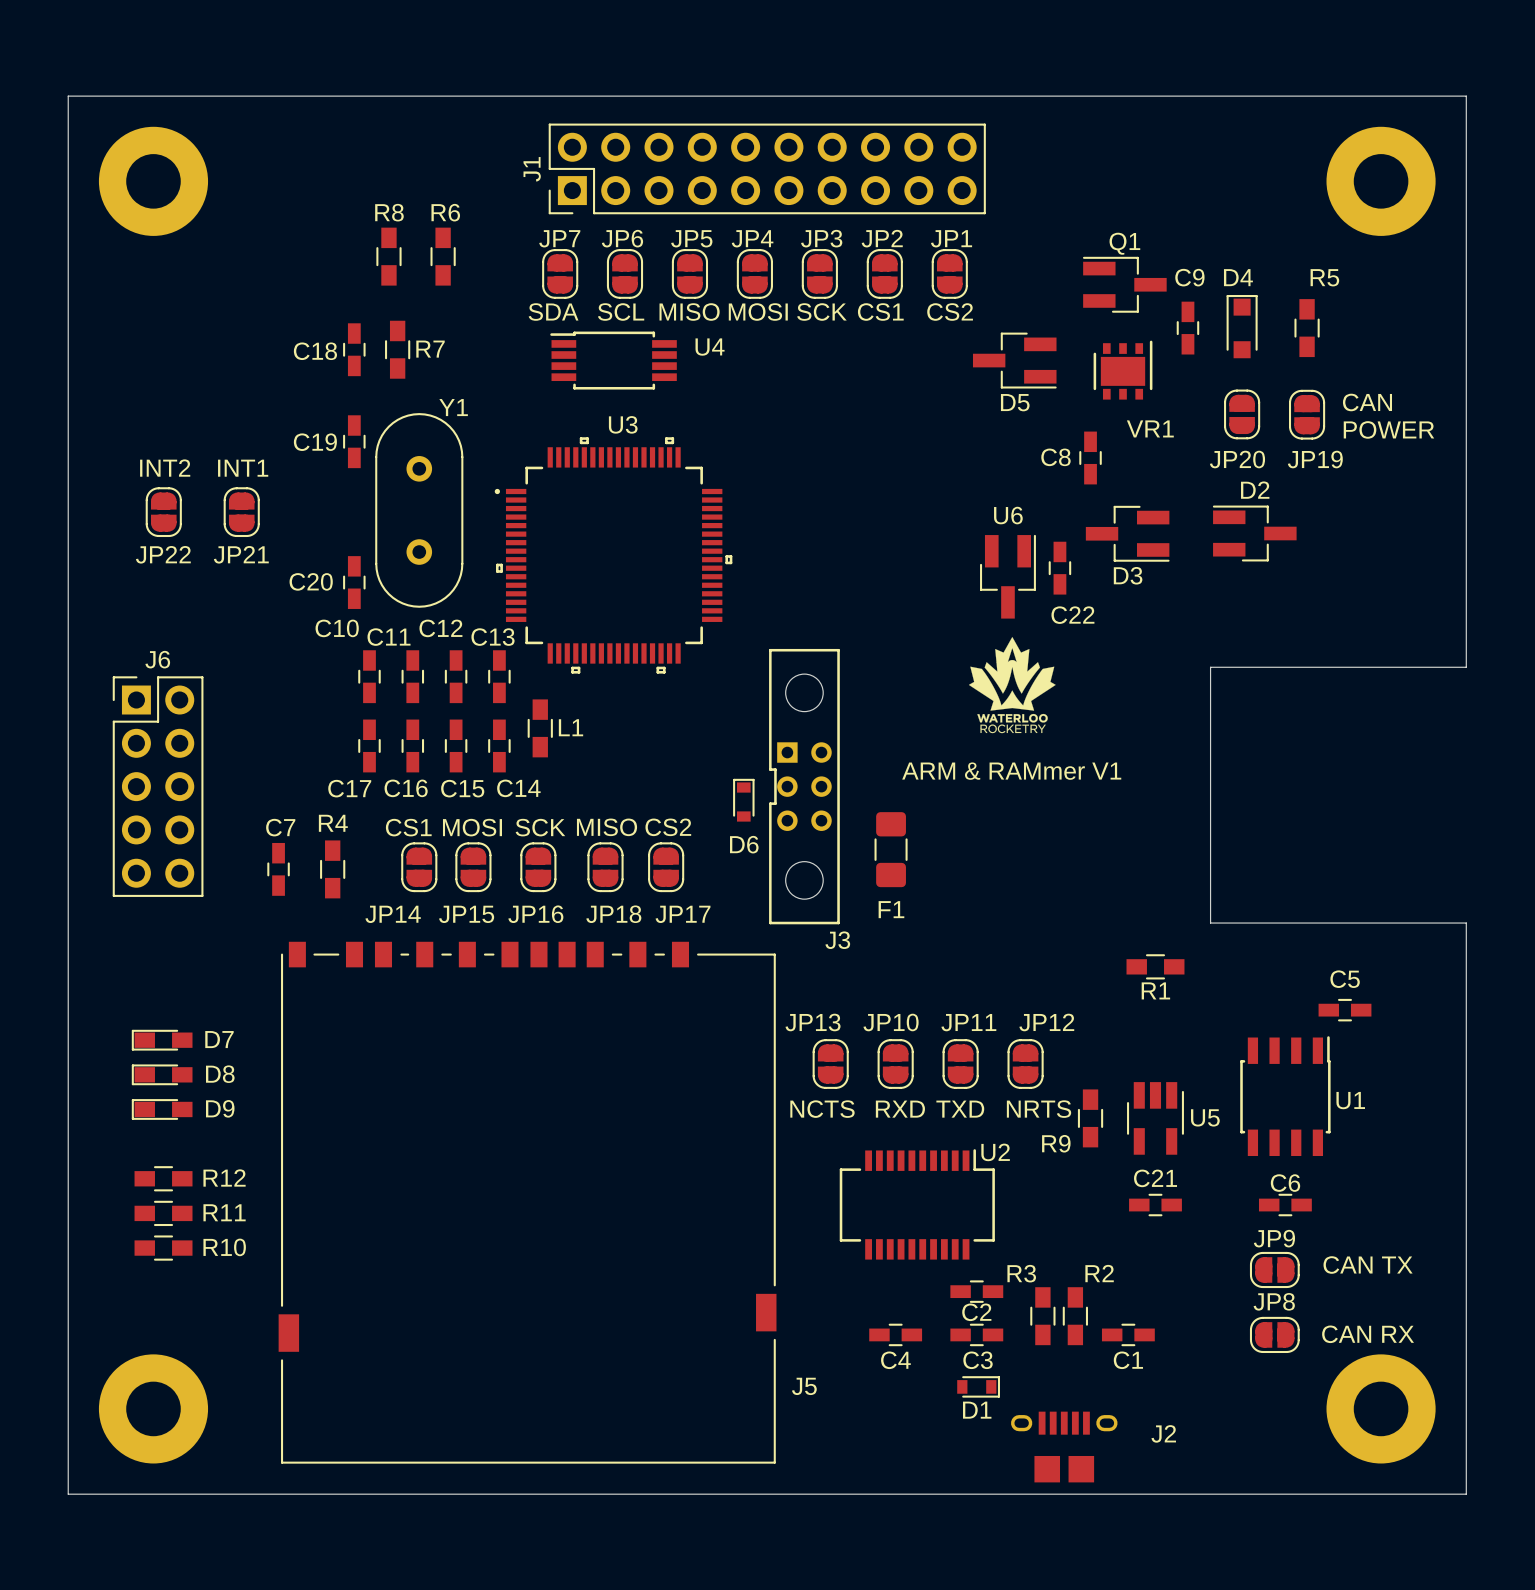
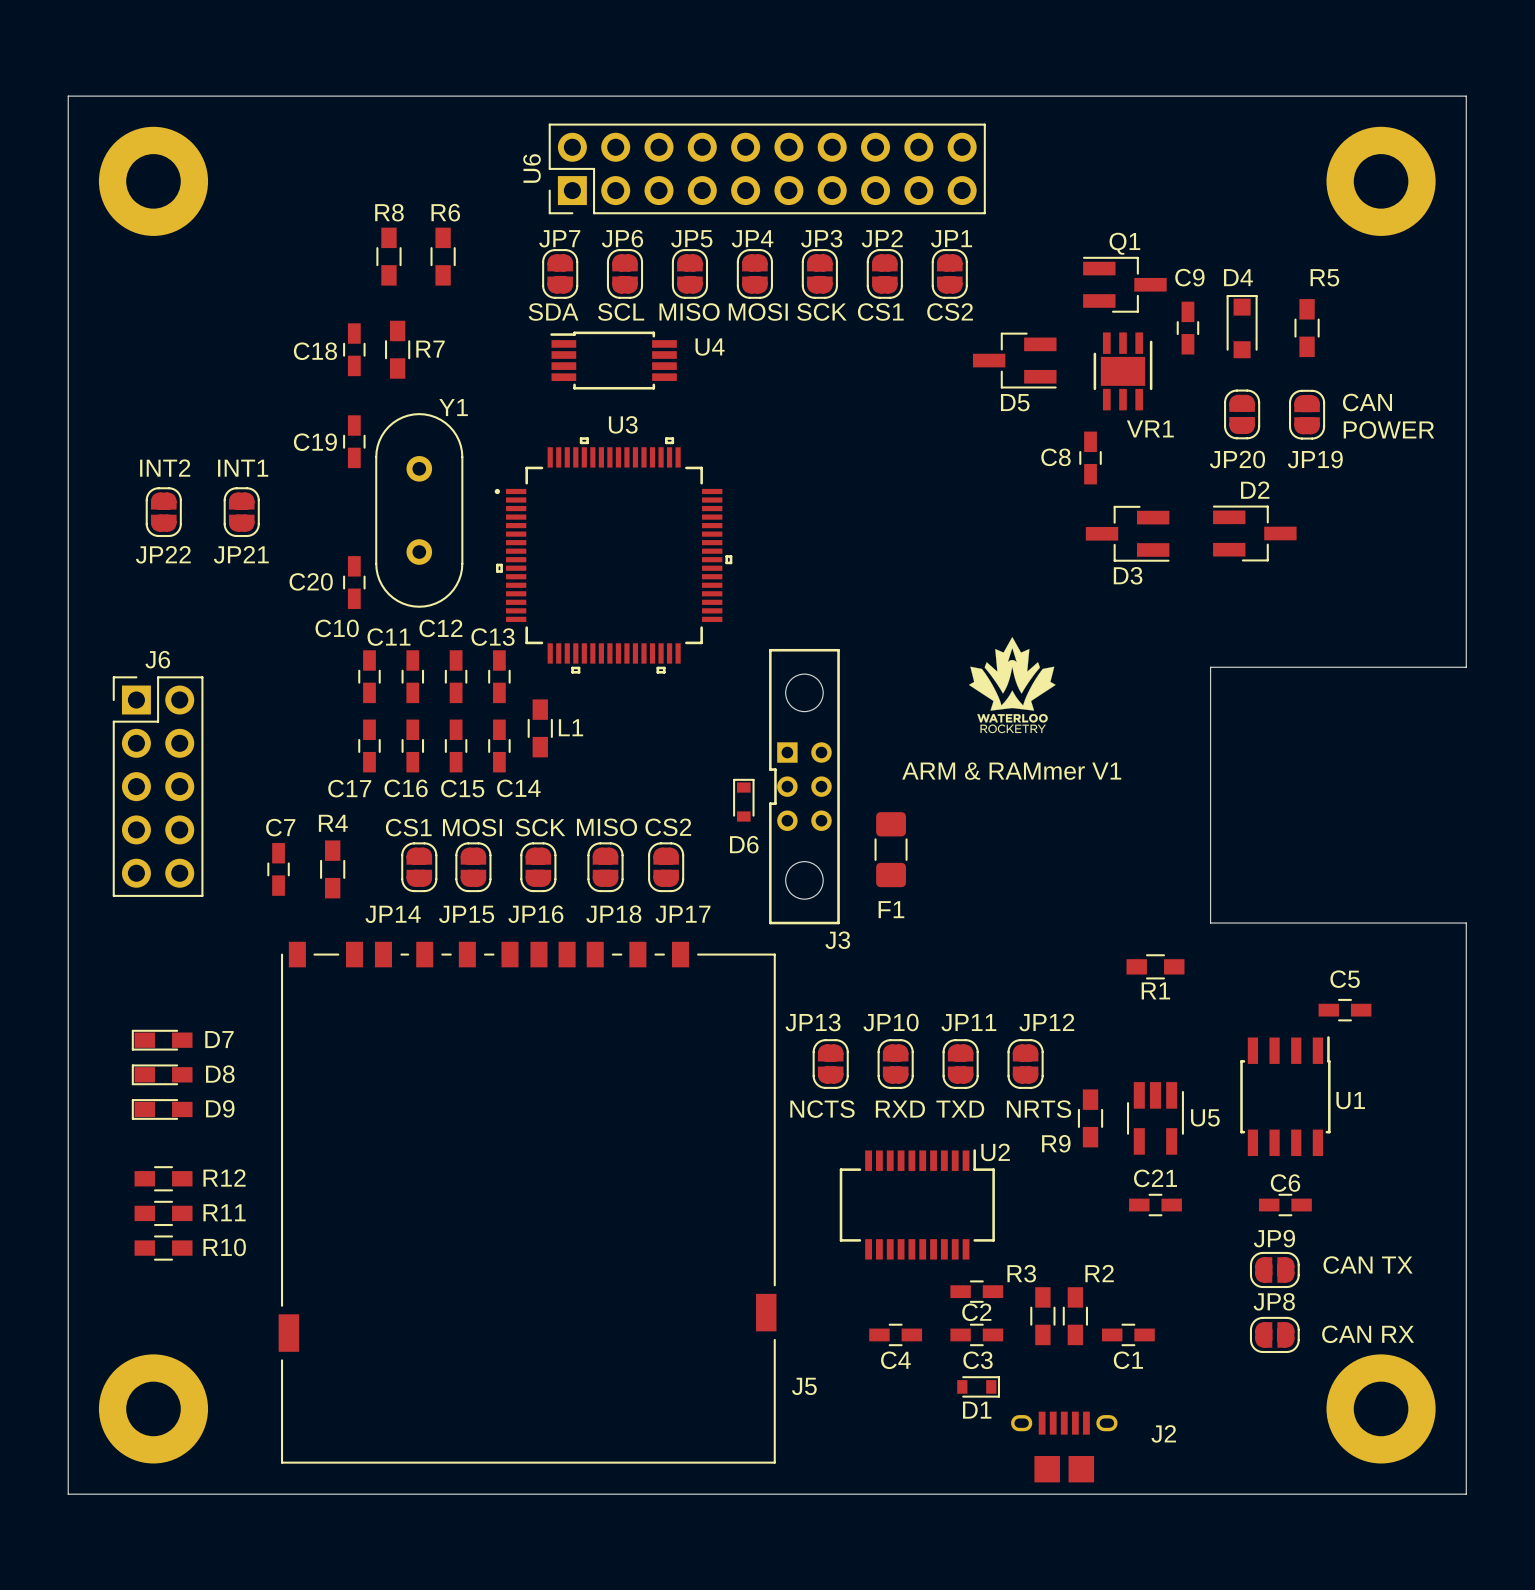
J1 name: J1 (532, 169) -> U6 (532, 168)
VR1 footprint: [1093, 340, 1153, 400] -> [1093, 332, 1153, 411]
C22: (1059, 568) -> none
U6: (1007, 576) -> none

